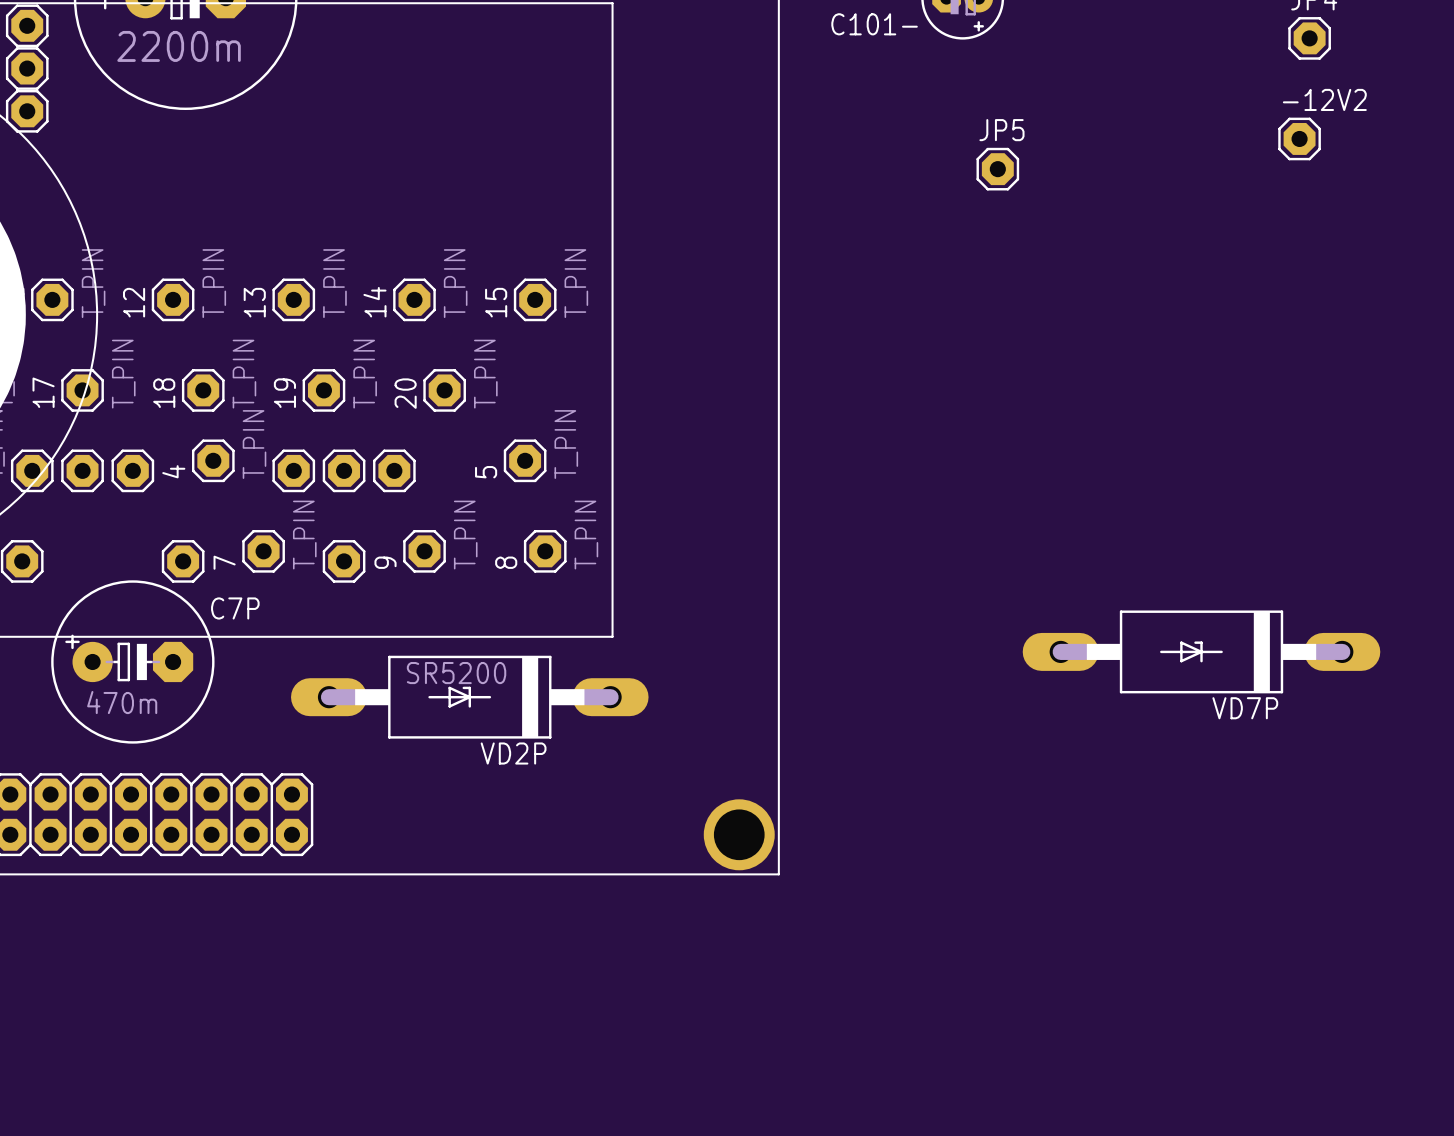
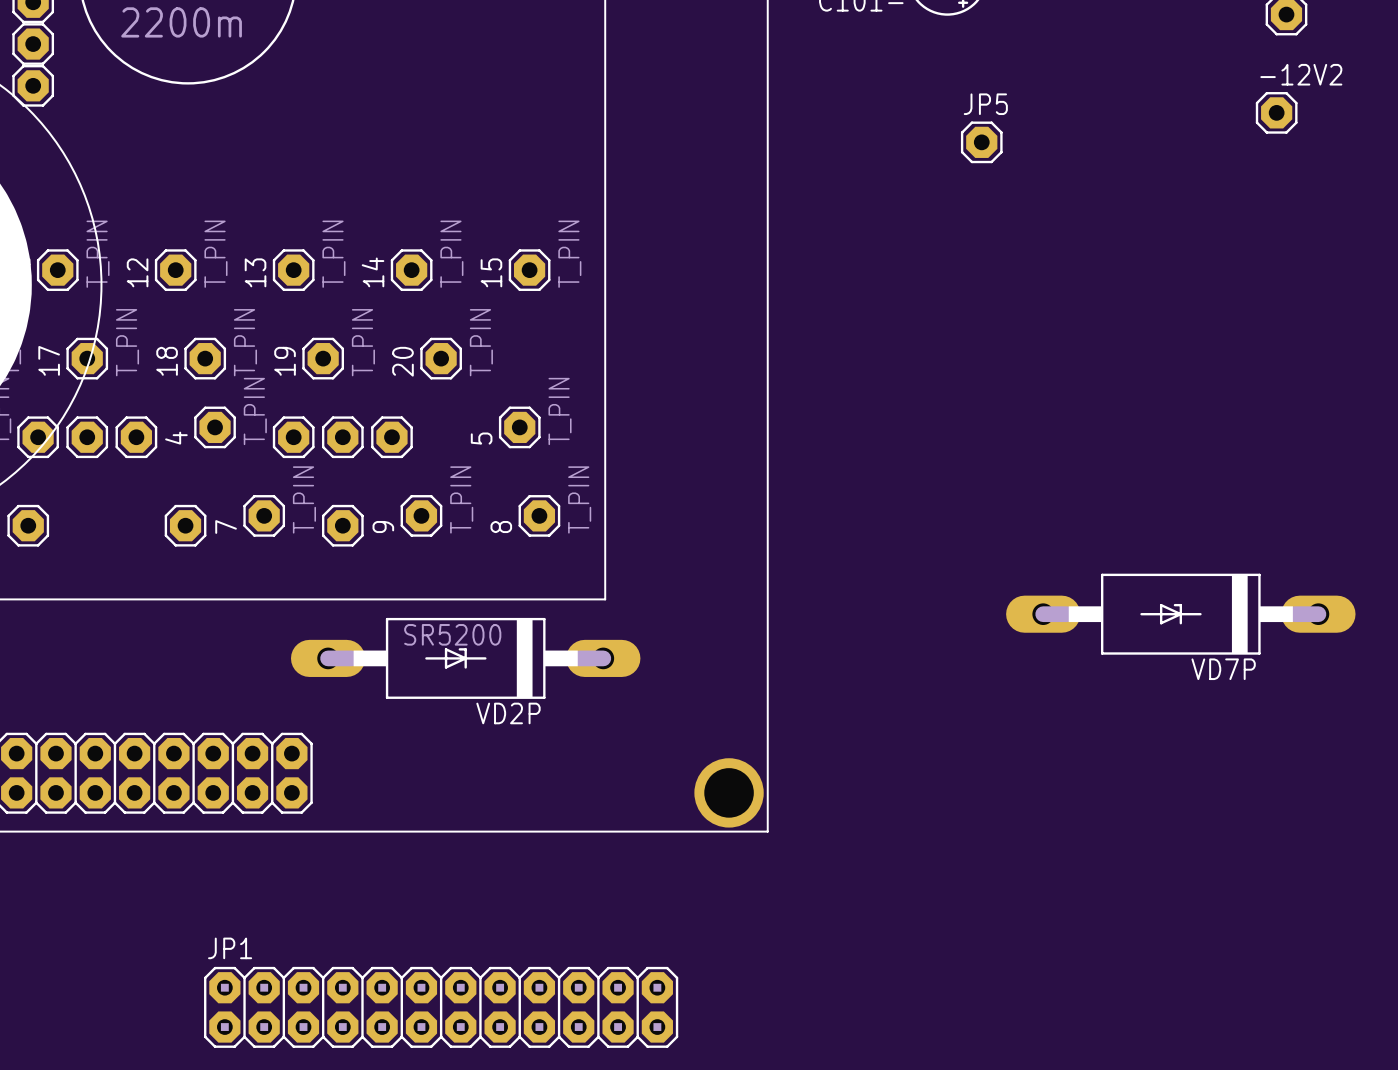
C7P: 470m (132, 661) -> none
JP1: none -> (441, 1007)

